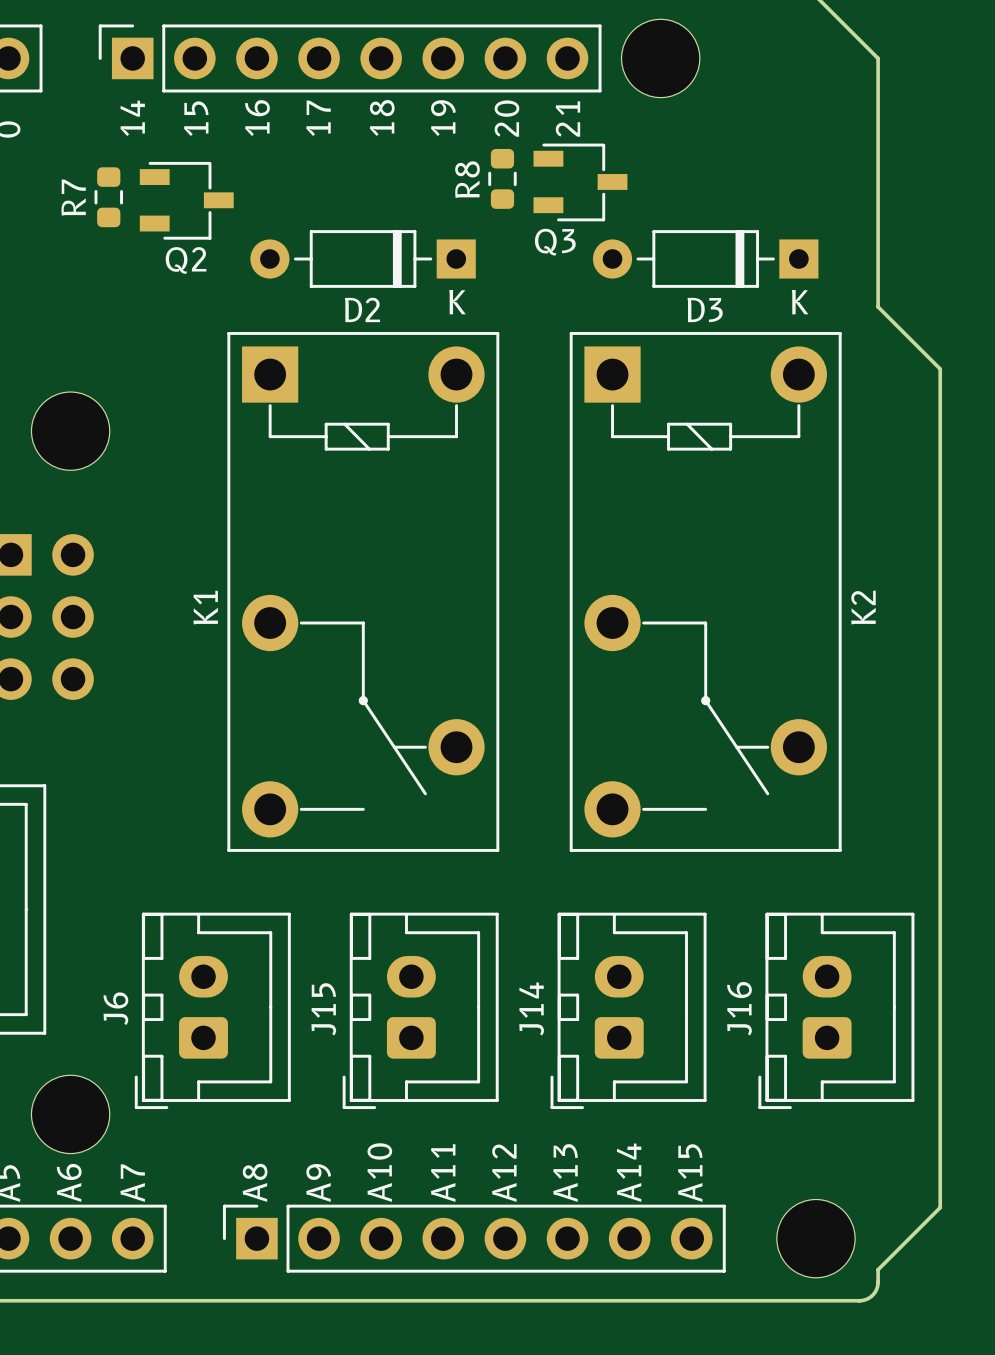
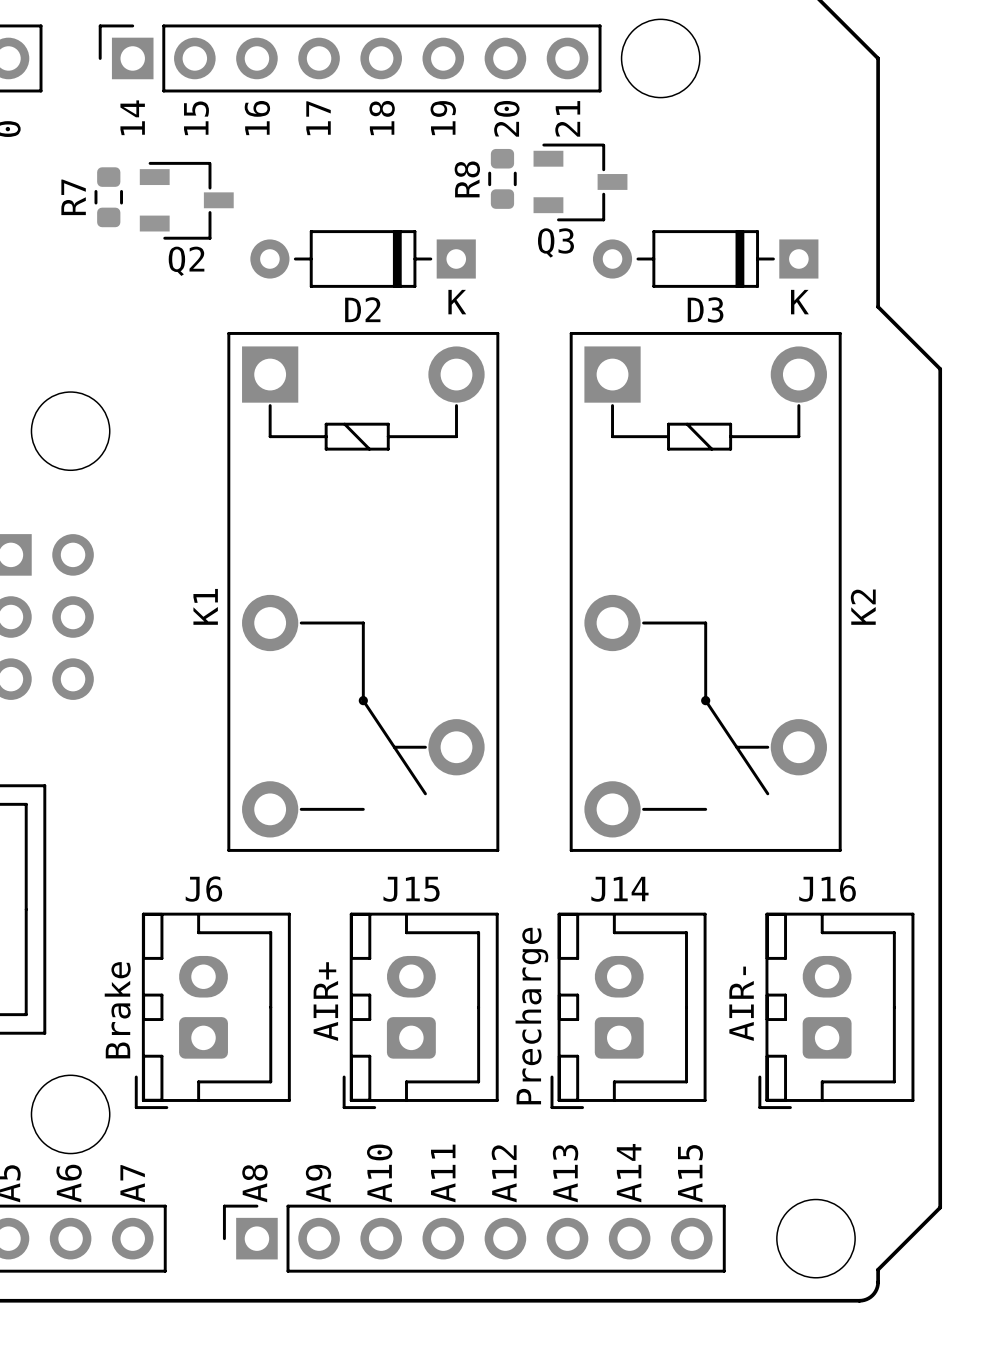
text: none -> AIR+ (325, 1001)
J6 name rotation: 0° (115, 1008) -> 90° clockwise (203, 889)
J6 name position: J6 (115, 1008) -> J6 (203, 889)
J14 name rotation: 0° (531, 1008) -> 90° clockwise (619, 889)
J14 name position: J14 (531, 1008) -> J14 (619, 889)
J16 name rotation: 0° (739, 1008) -> 90° clockwise (827, 889)
J16 name position: J16 (739, 1008) -> J16 (827, 889)
J15 name rotation: 0° (323, 1009) -> 90° clockwise (411, 889)
J15 name position: J15 (323, 1009) -> J15 (411, 889)
text: none -> AIR- (741, 1003)
text: none -> Brake (117, 1010)
text: none -> Precharge (531, 1016)

